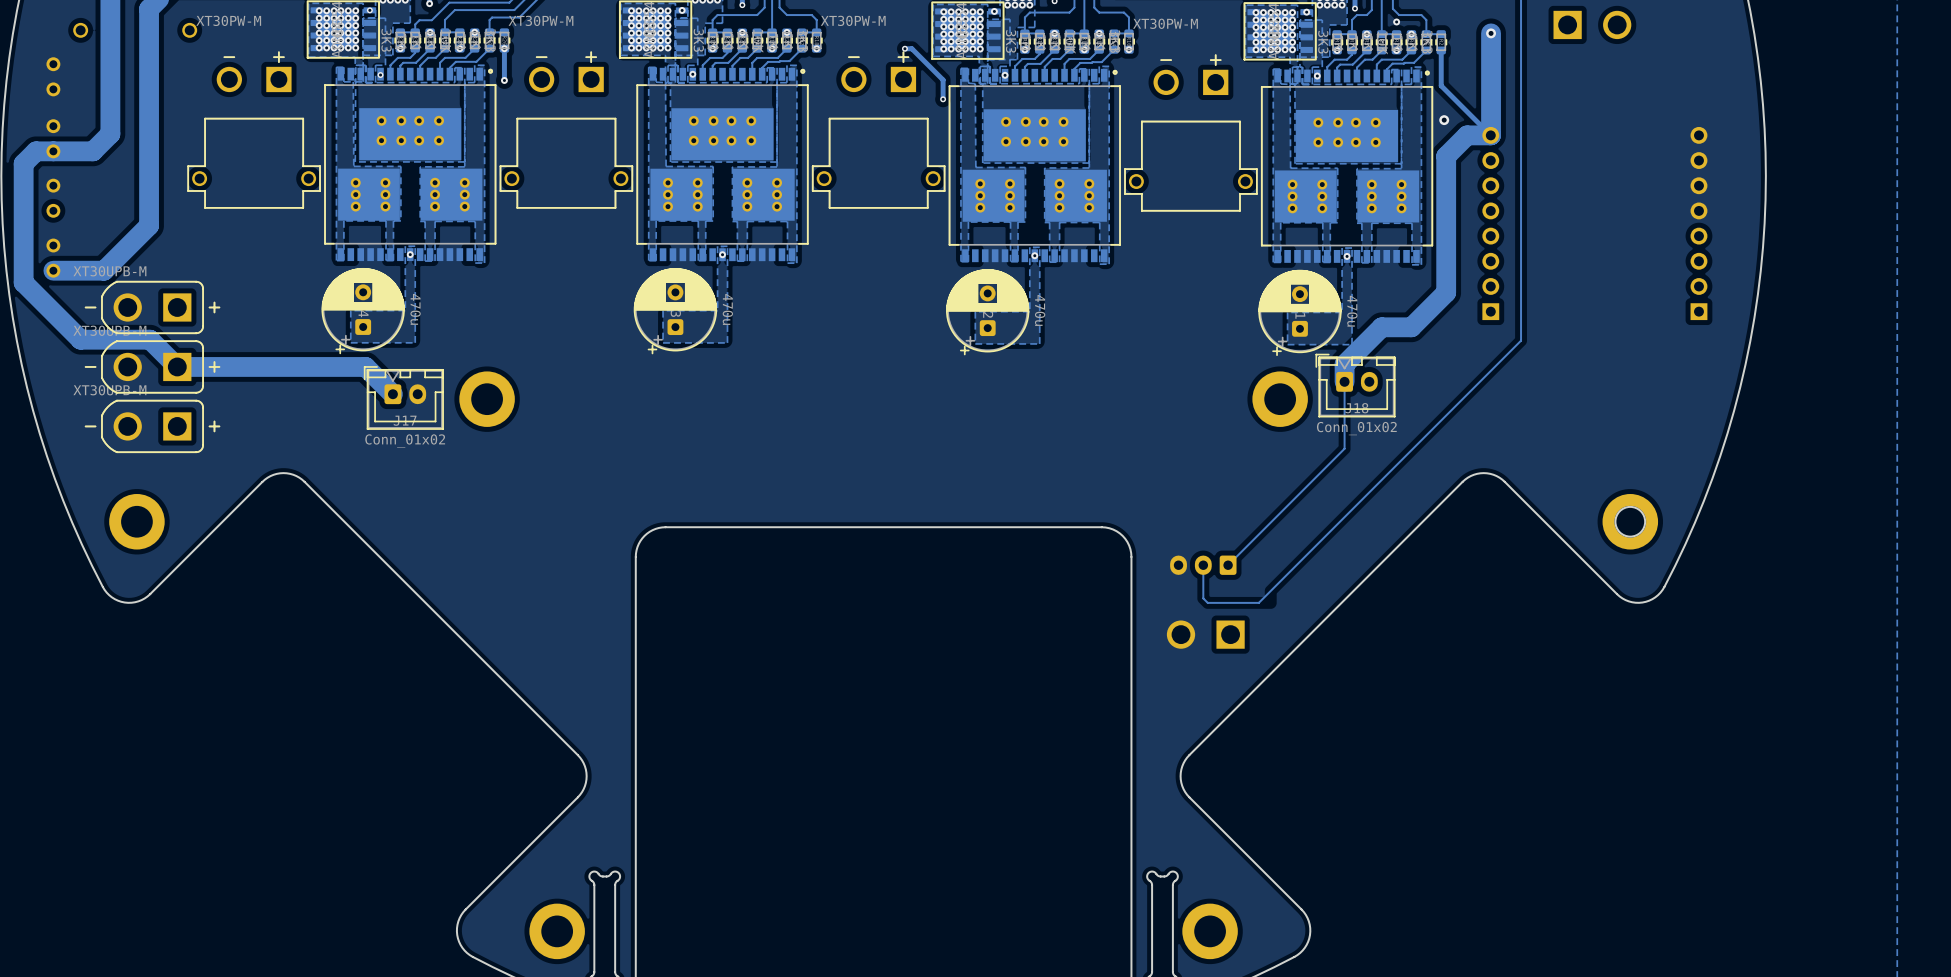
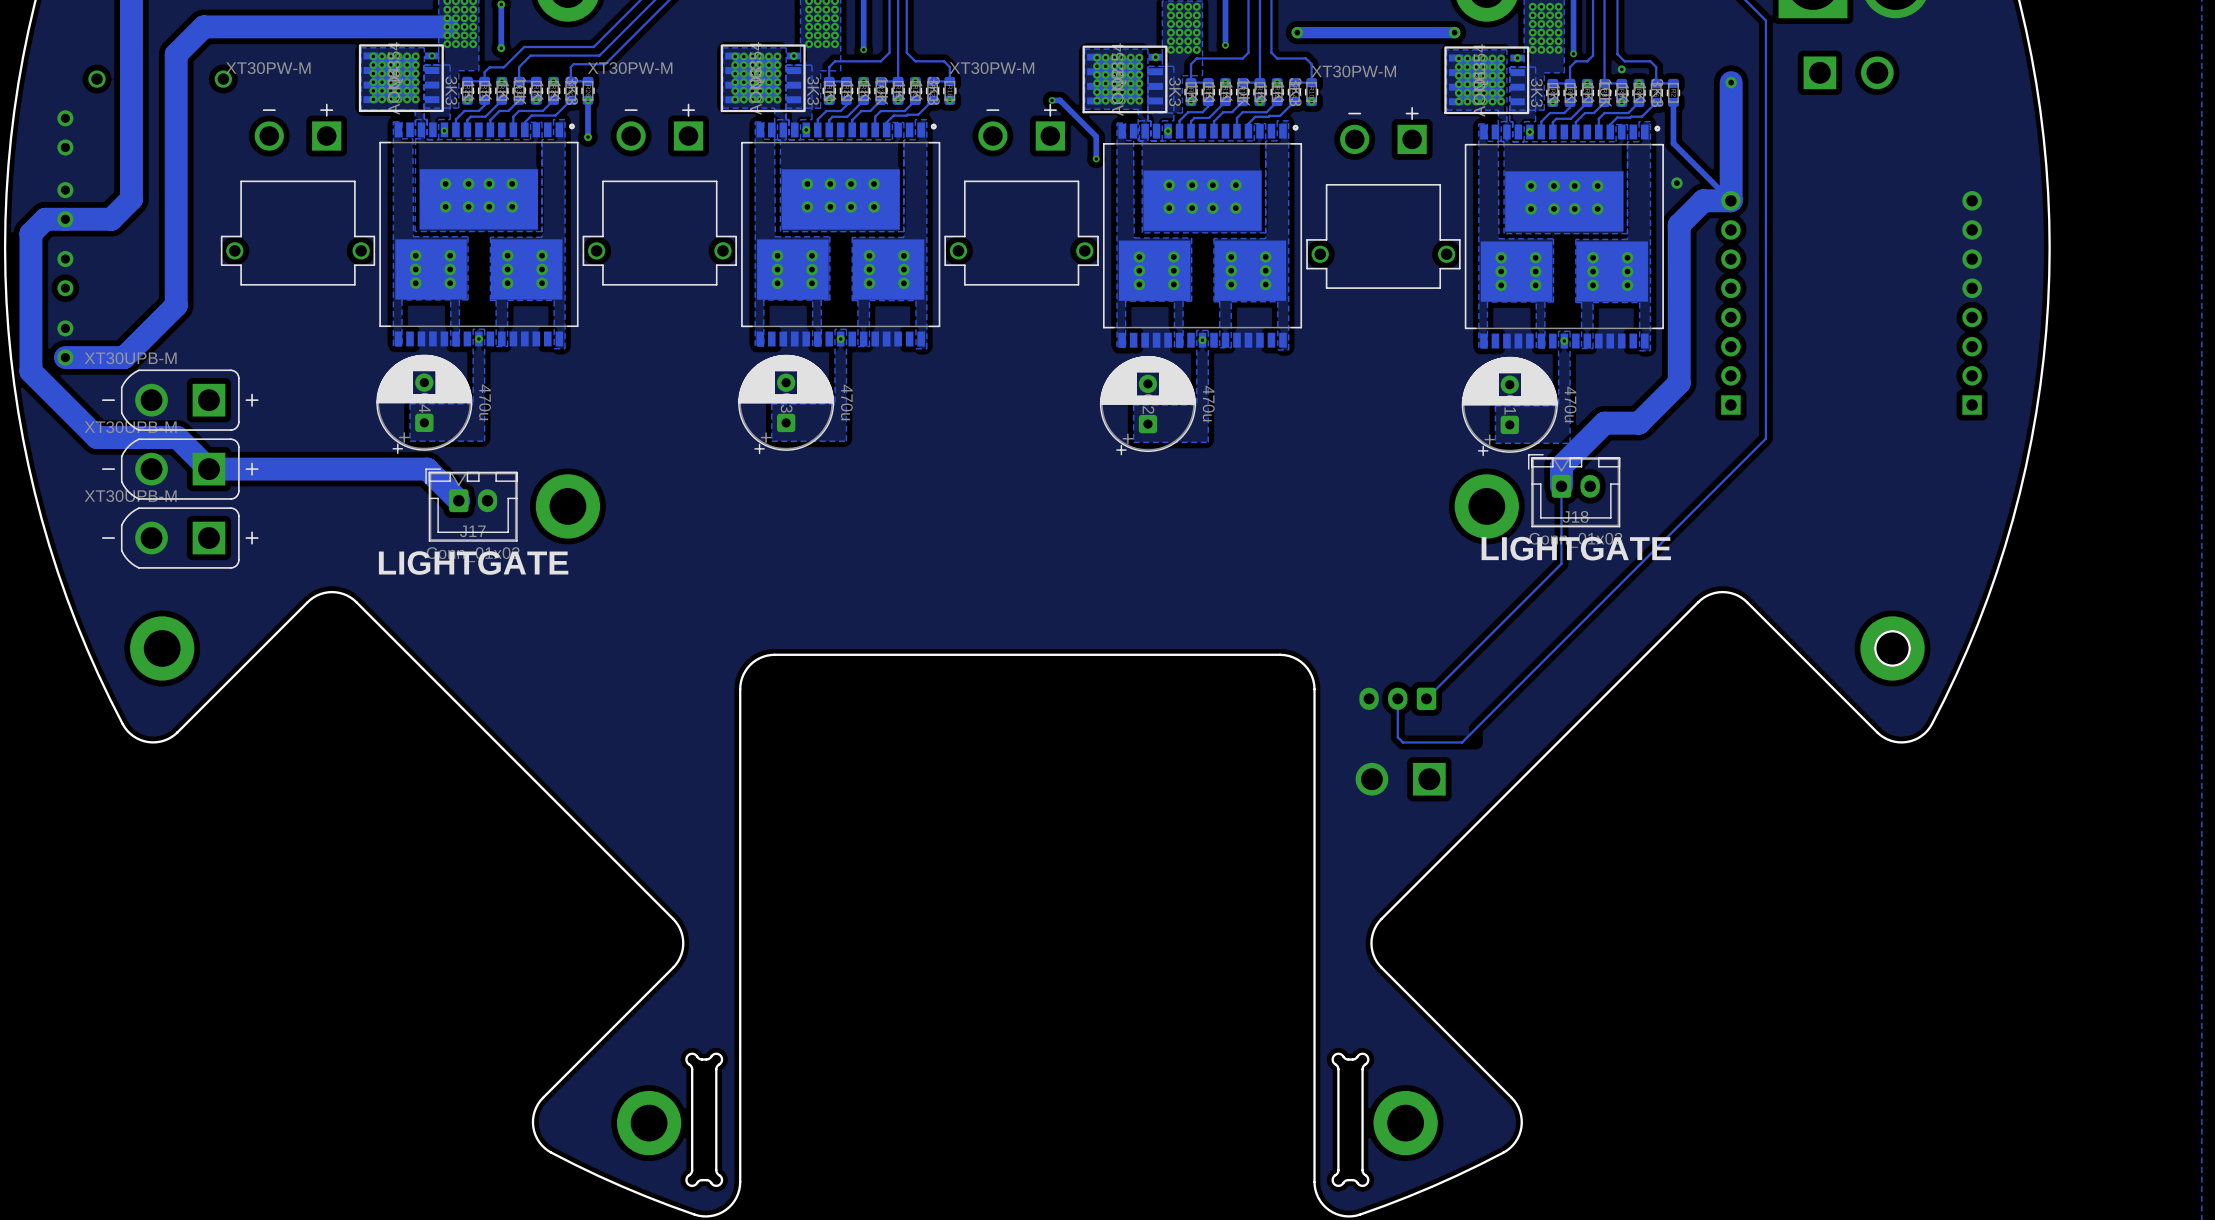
text: none -> LIGHTGATE (1576, 548)
text: none -> LIGHTGATE (473, 563)

